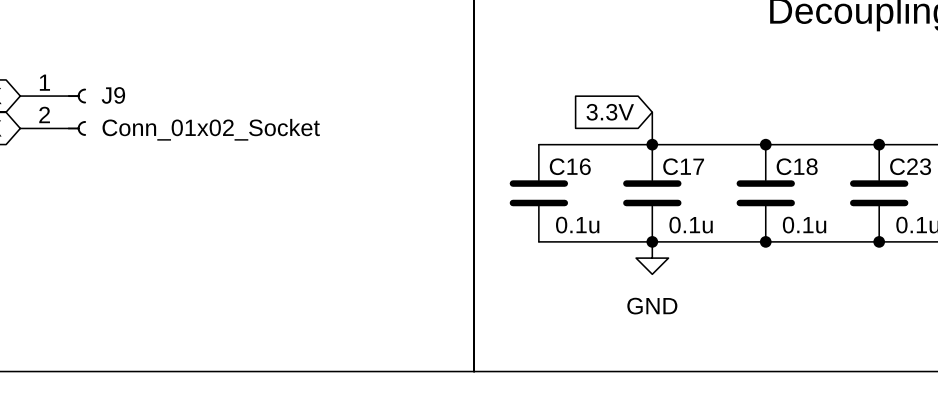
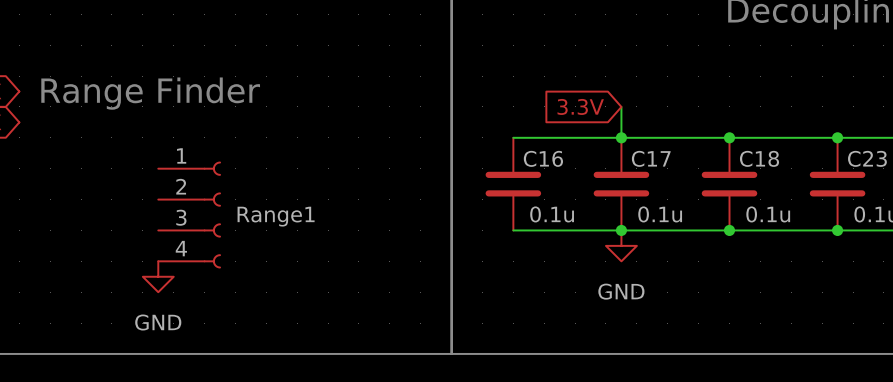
text: none -> Range Finder (150, 93)
J9: Conn_01x02_Socket (53, 112) -> none
Range1: none -> (189, 215)
power symbol: none -> GND (158, 276)

